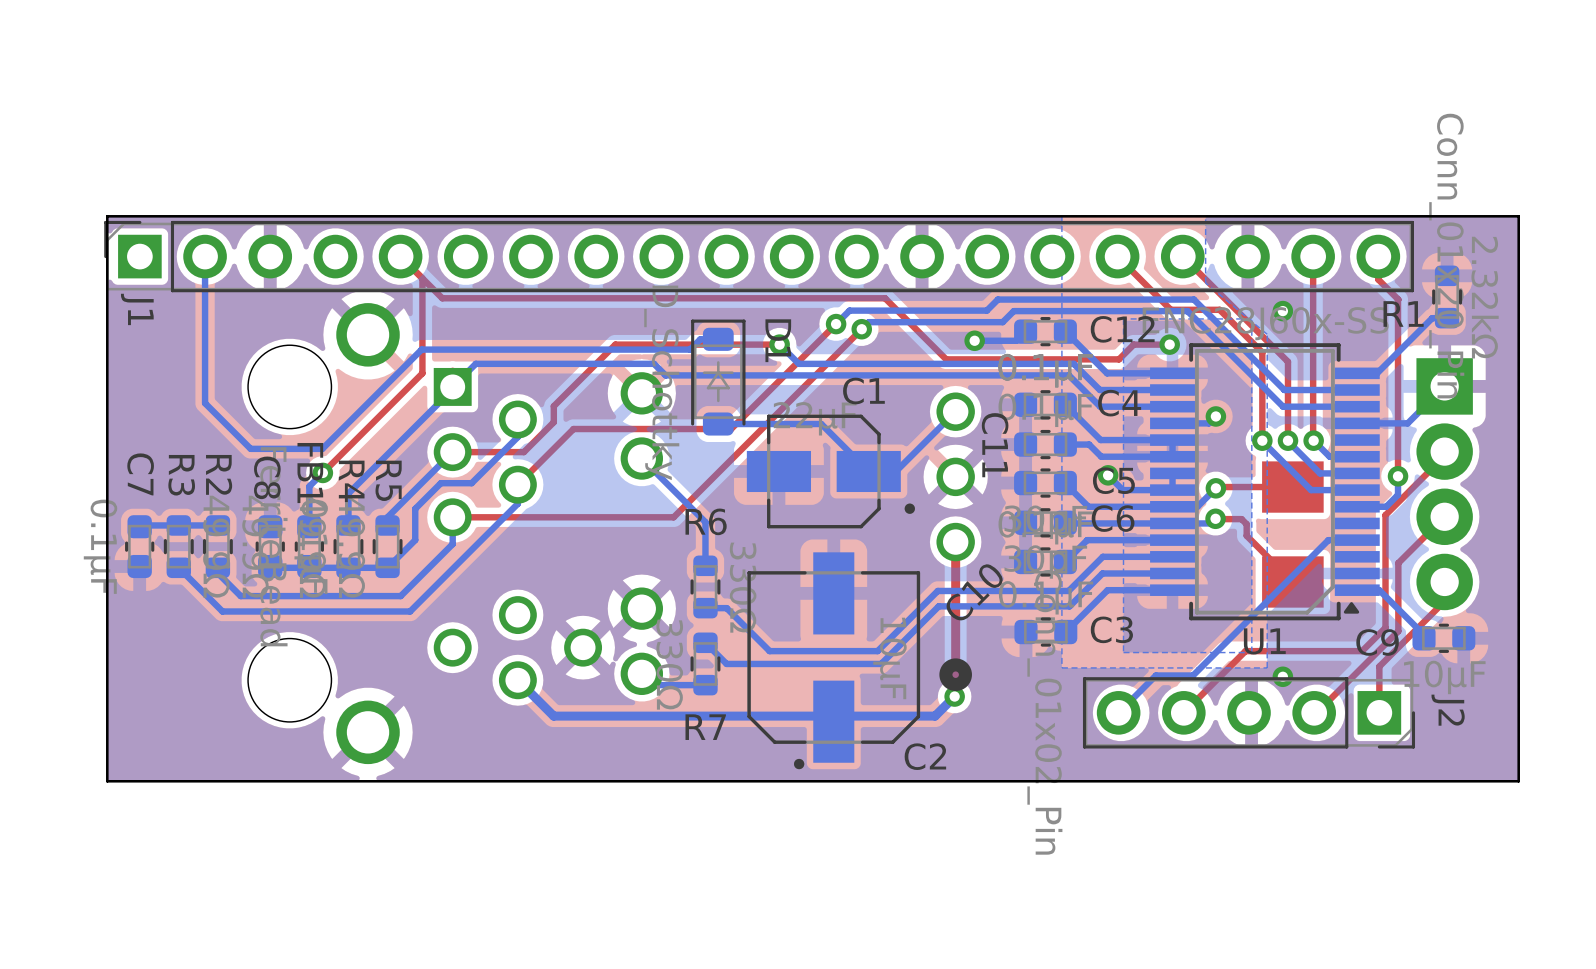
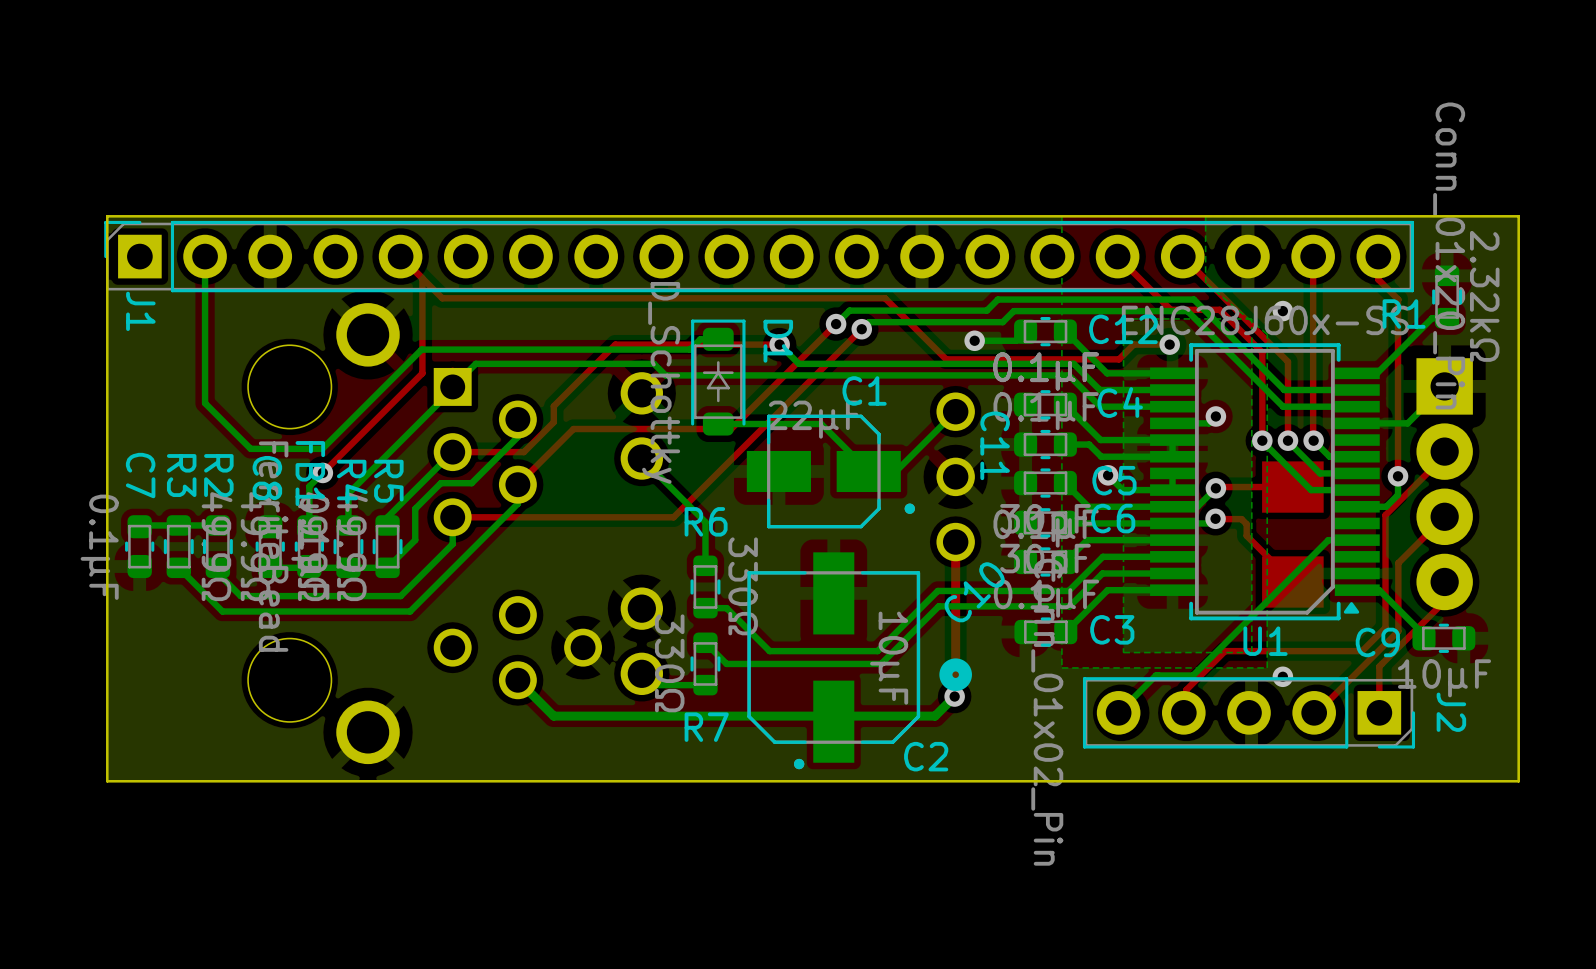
top track: (1245, 651) (1183, 712) -> (1245, 651) (1225, 651) (1186, 689) (1186, 712)

